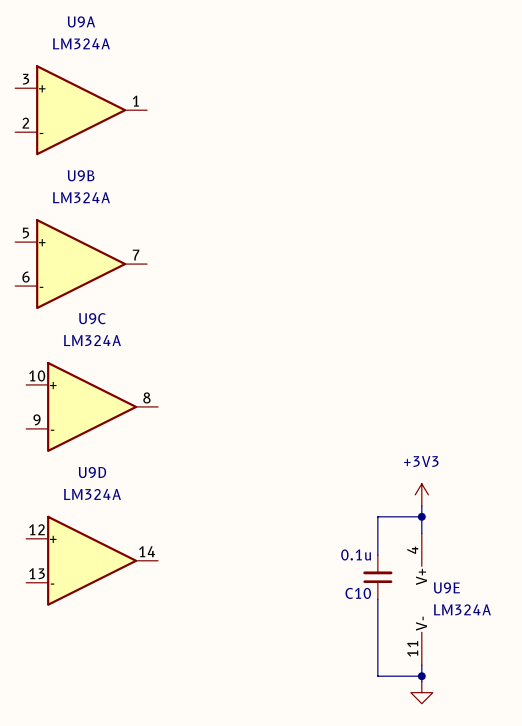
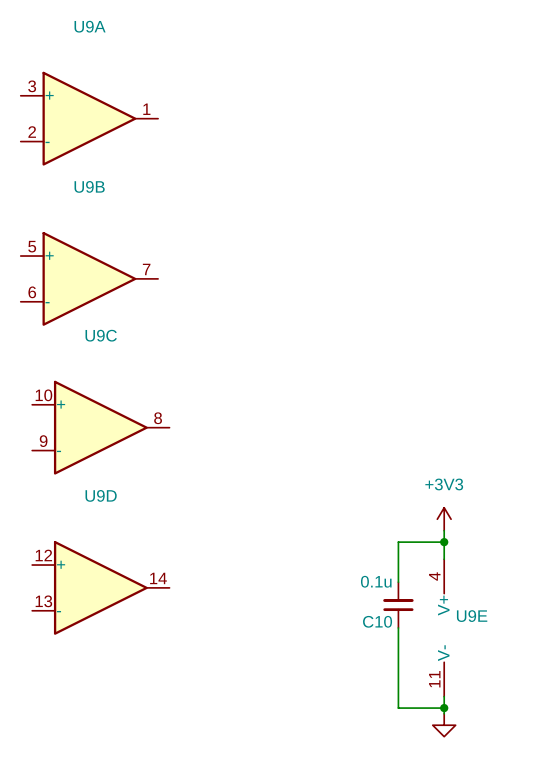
U9A value: LM324A (81, 43) -> none
U9B value: LM324A (81, 197) -> none
U9C value: LM324A (92, 340) -> none
U9D value: LM324A (92, 494) -> none
U9E value: LM324A (462, 609) -> none

